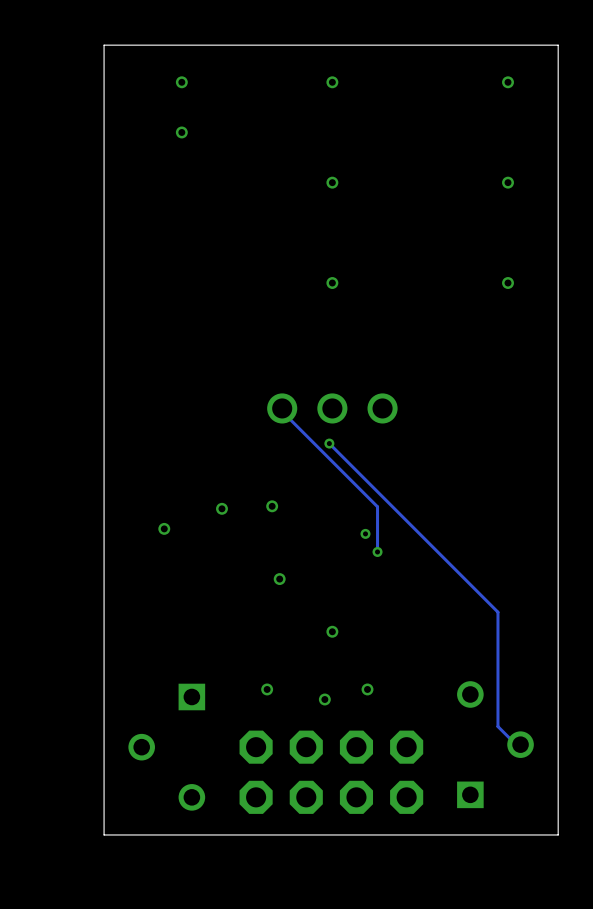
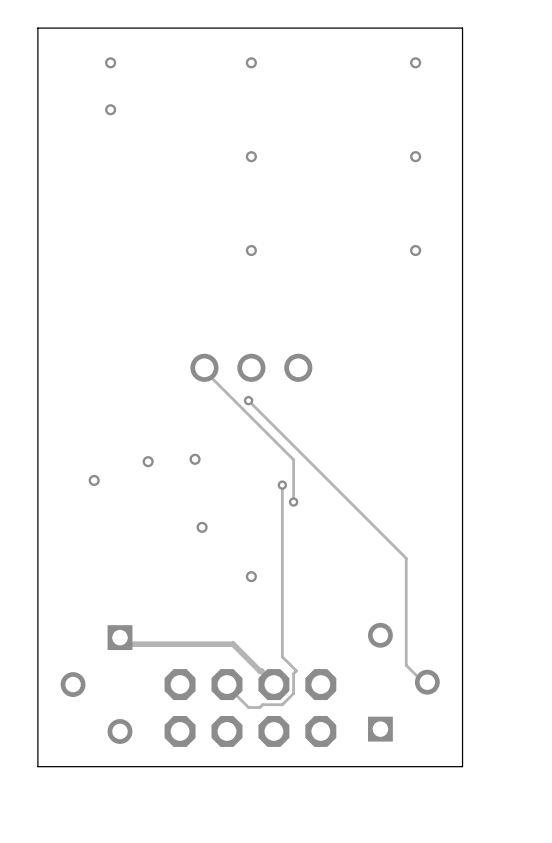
track: none -> (282, 485) (282, 656) (296, 670) (293, 673) (293, 693) (282, 704) (262, 704) (259, 707) (248, 707) (226, 684)
via: (267, 689) -> none
via: (367, 689) -> none
track: none -> (120, 637) (126, 644) (233, 644) (273, 684)
via: (324, 699) -> none

